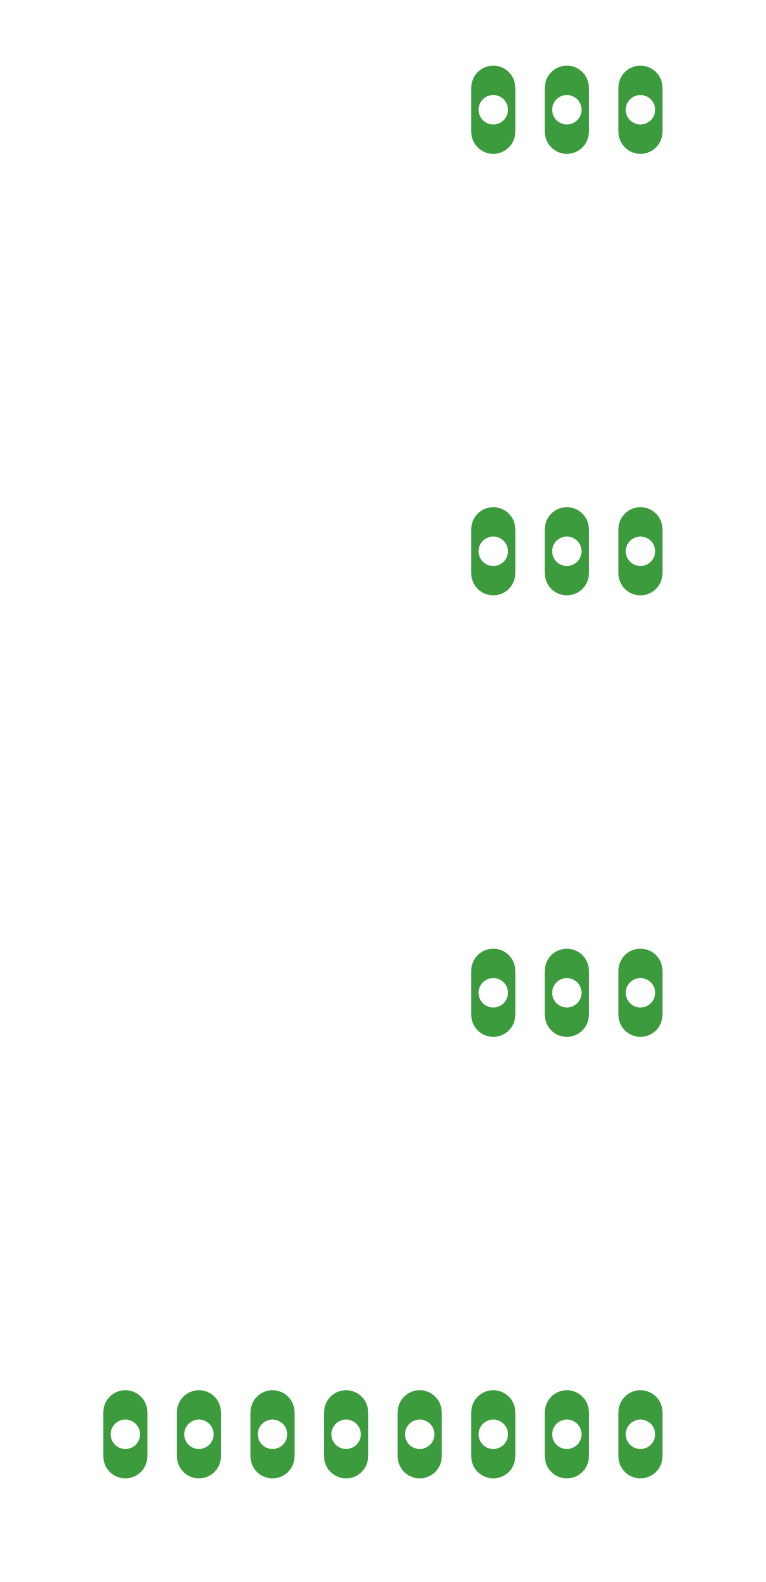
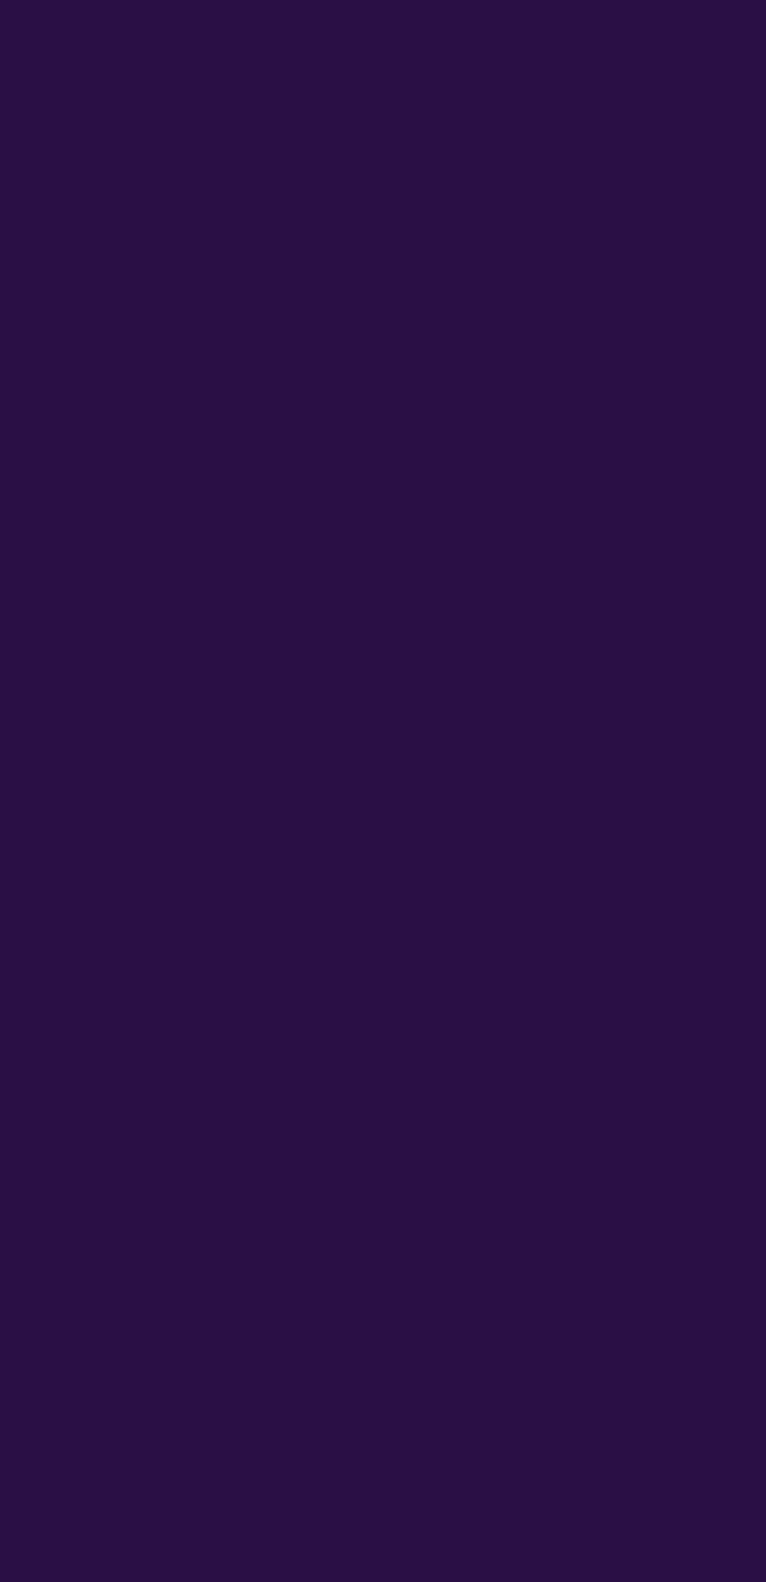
part: (566, 109) -> none
part: (566, 551) -> none
part: (566, 992) -> none
part: (382, 1434) -> none

